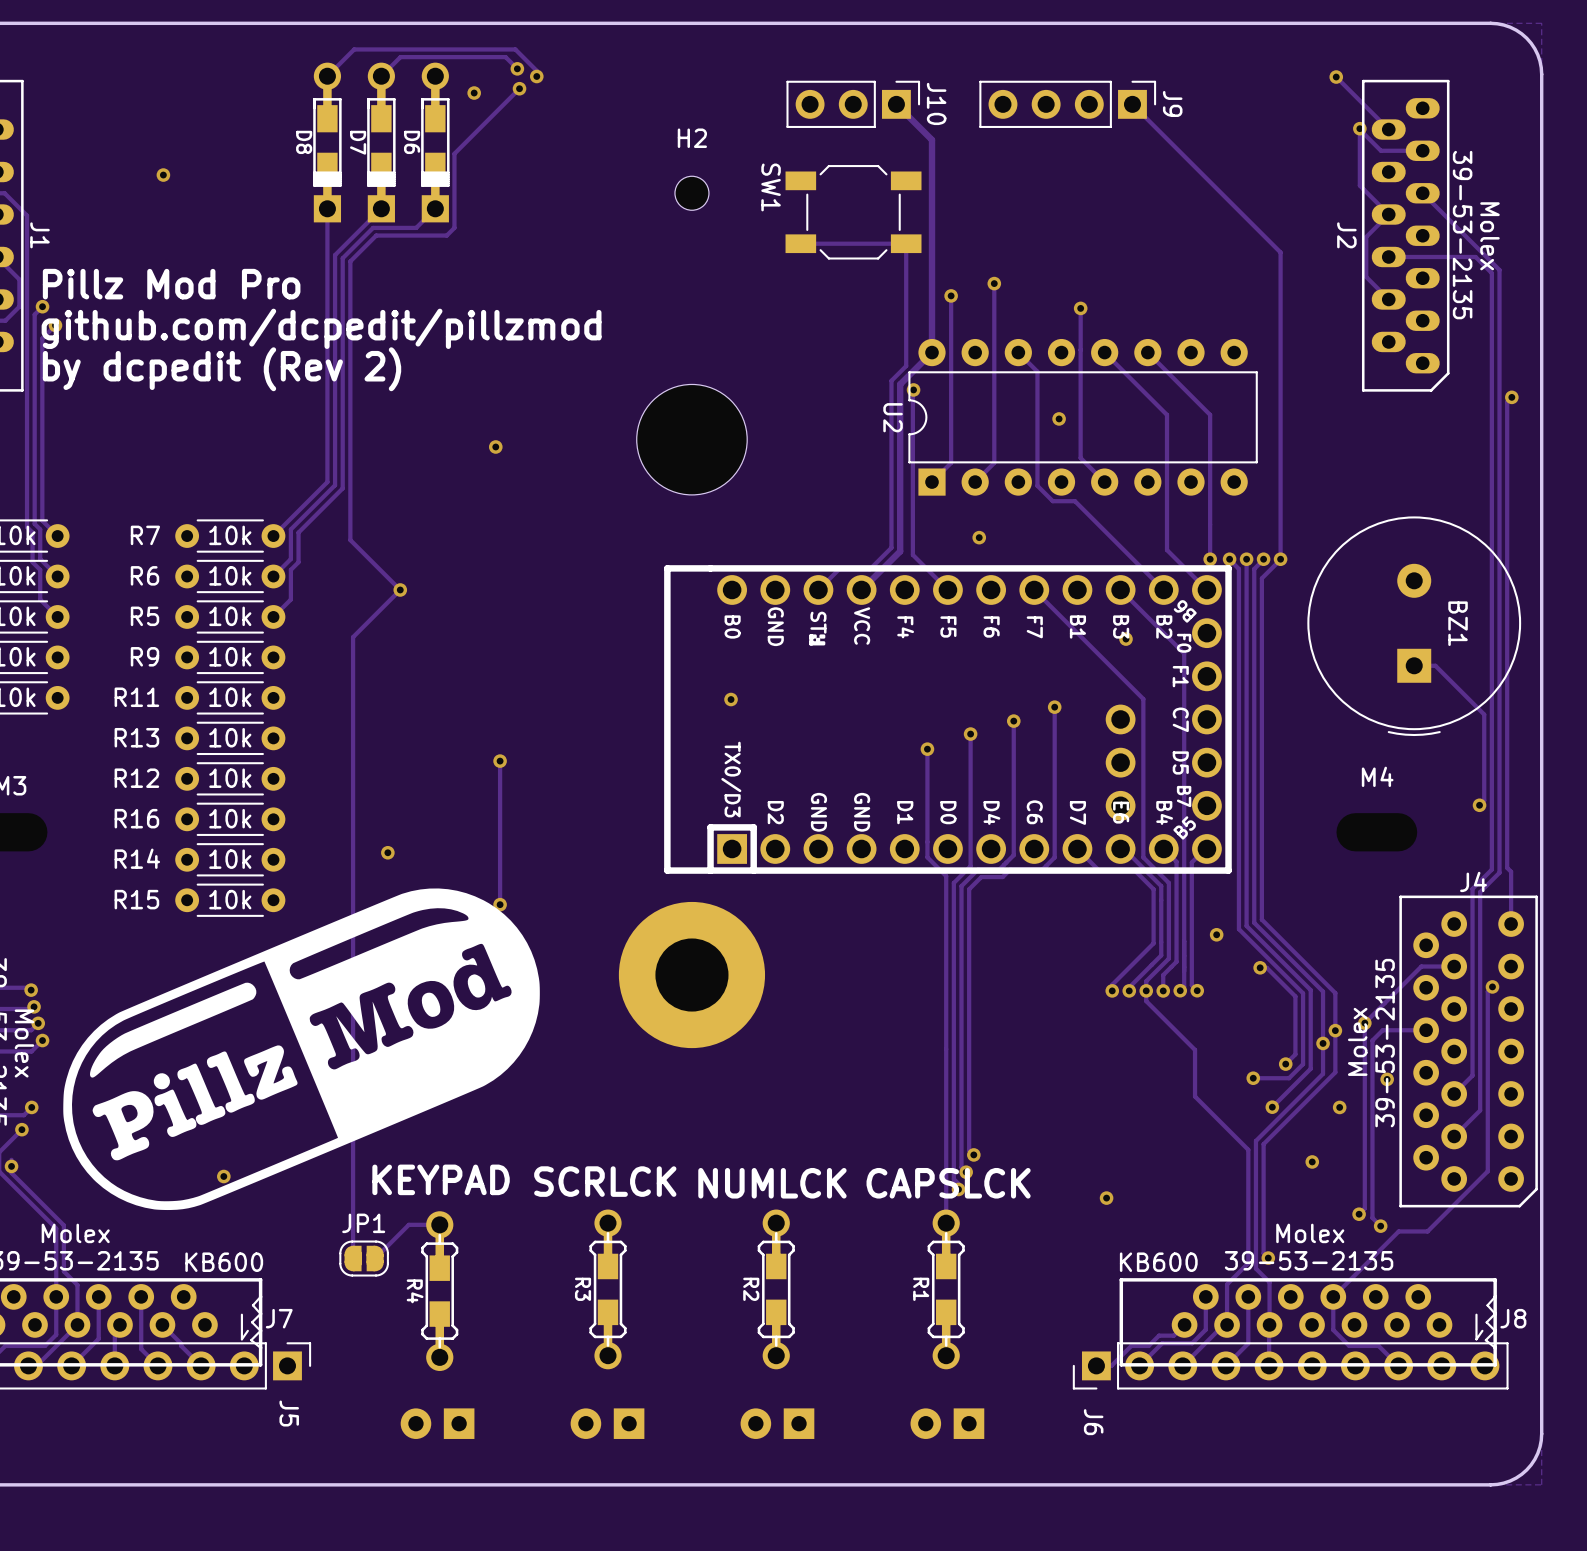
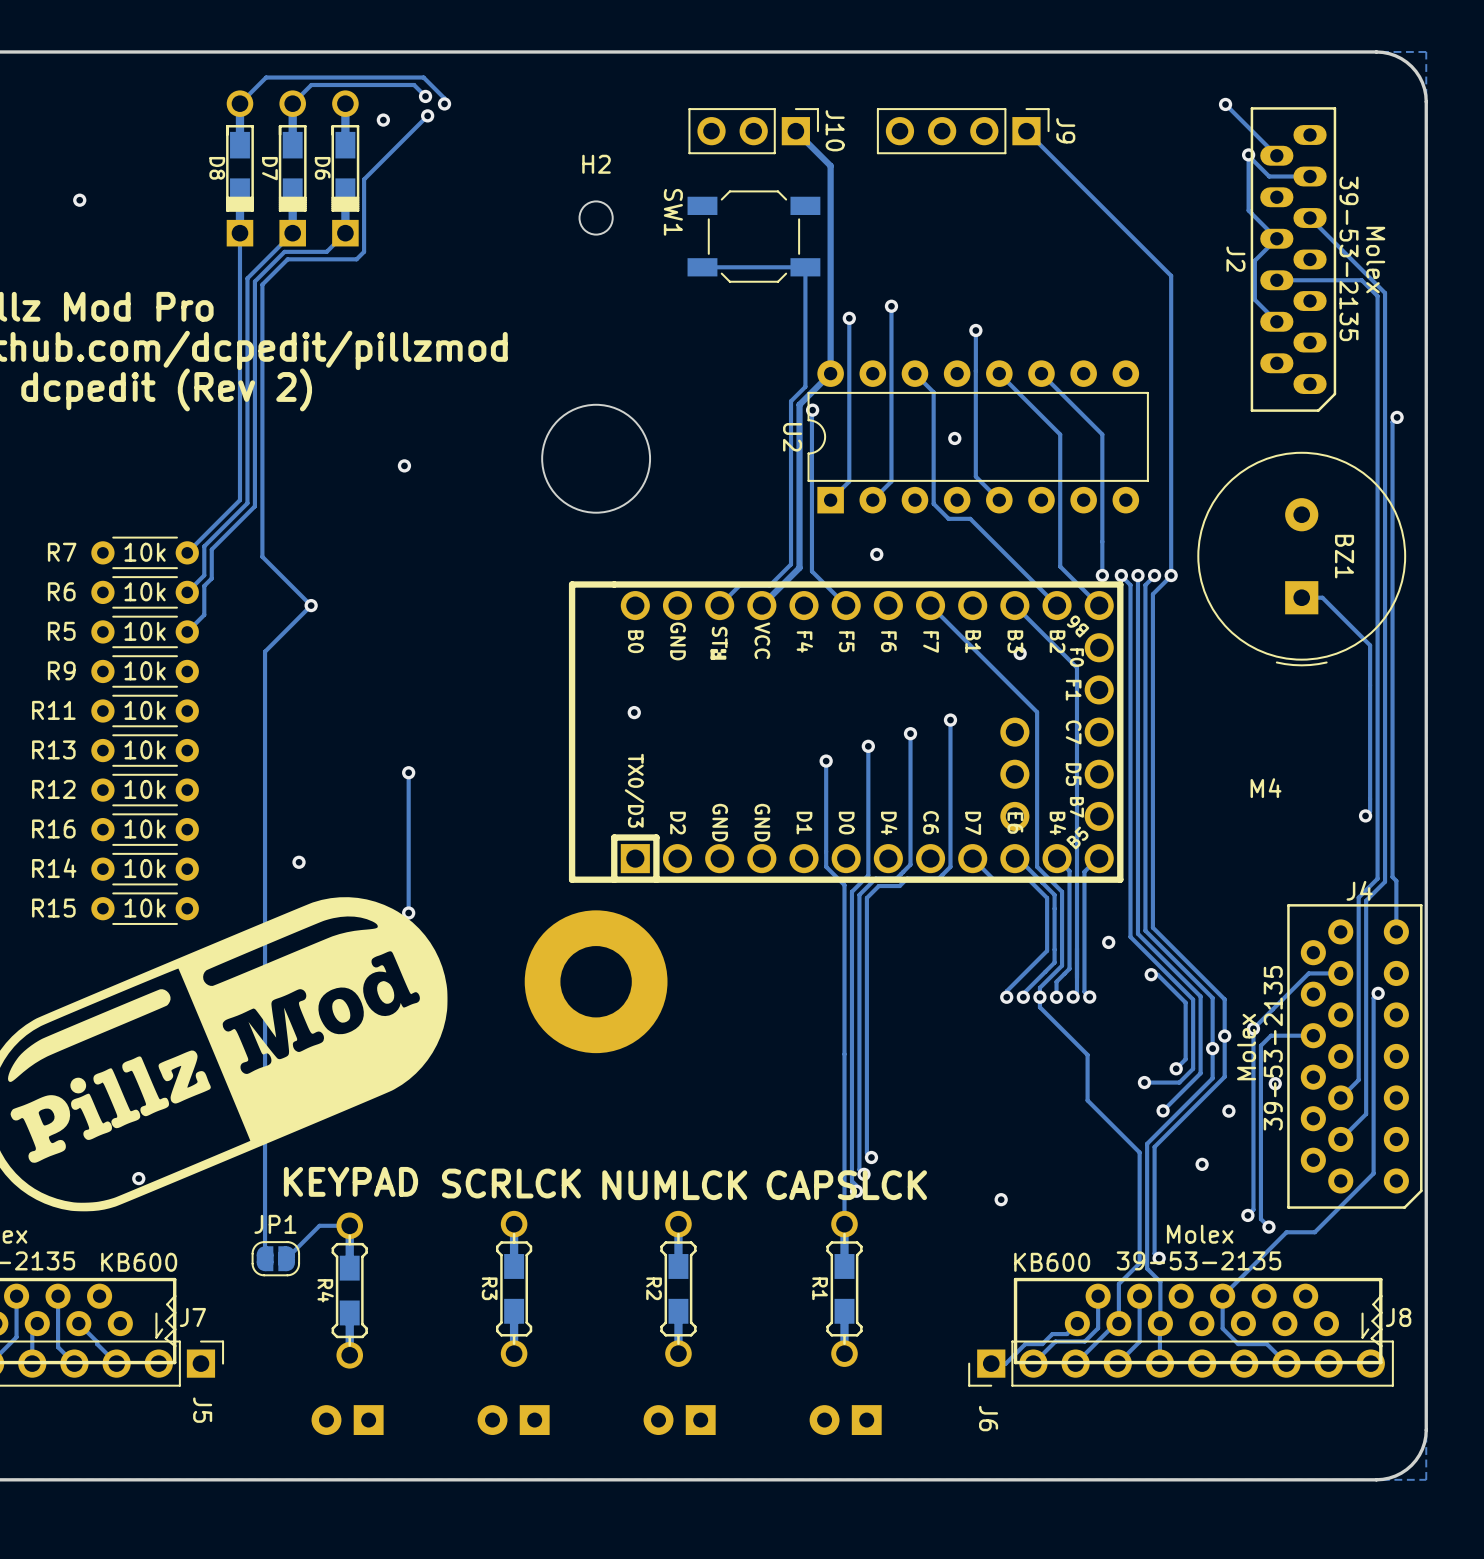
BZ1 position: (1414, 626) -> (1301, 559)
track: (1414, 665) (1435, 665) (1484, 714) -> (1301, 597) (1322, 597) (1370, 645) (1370, 727)

